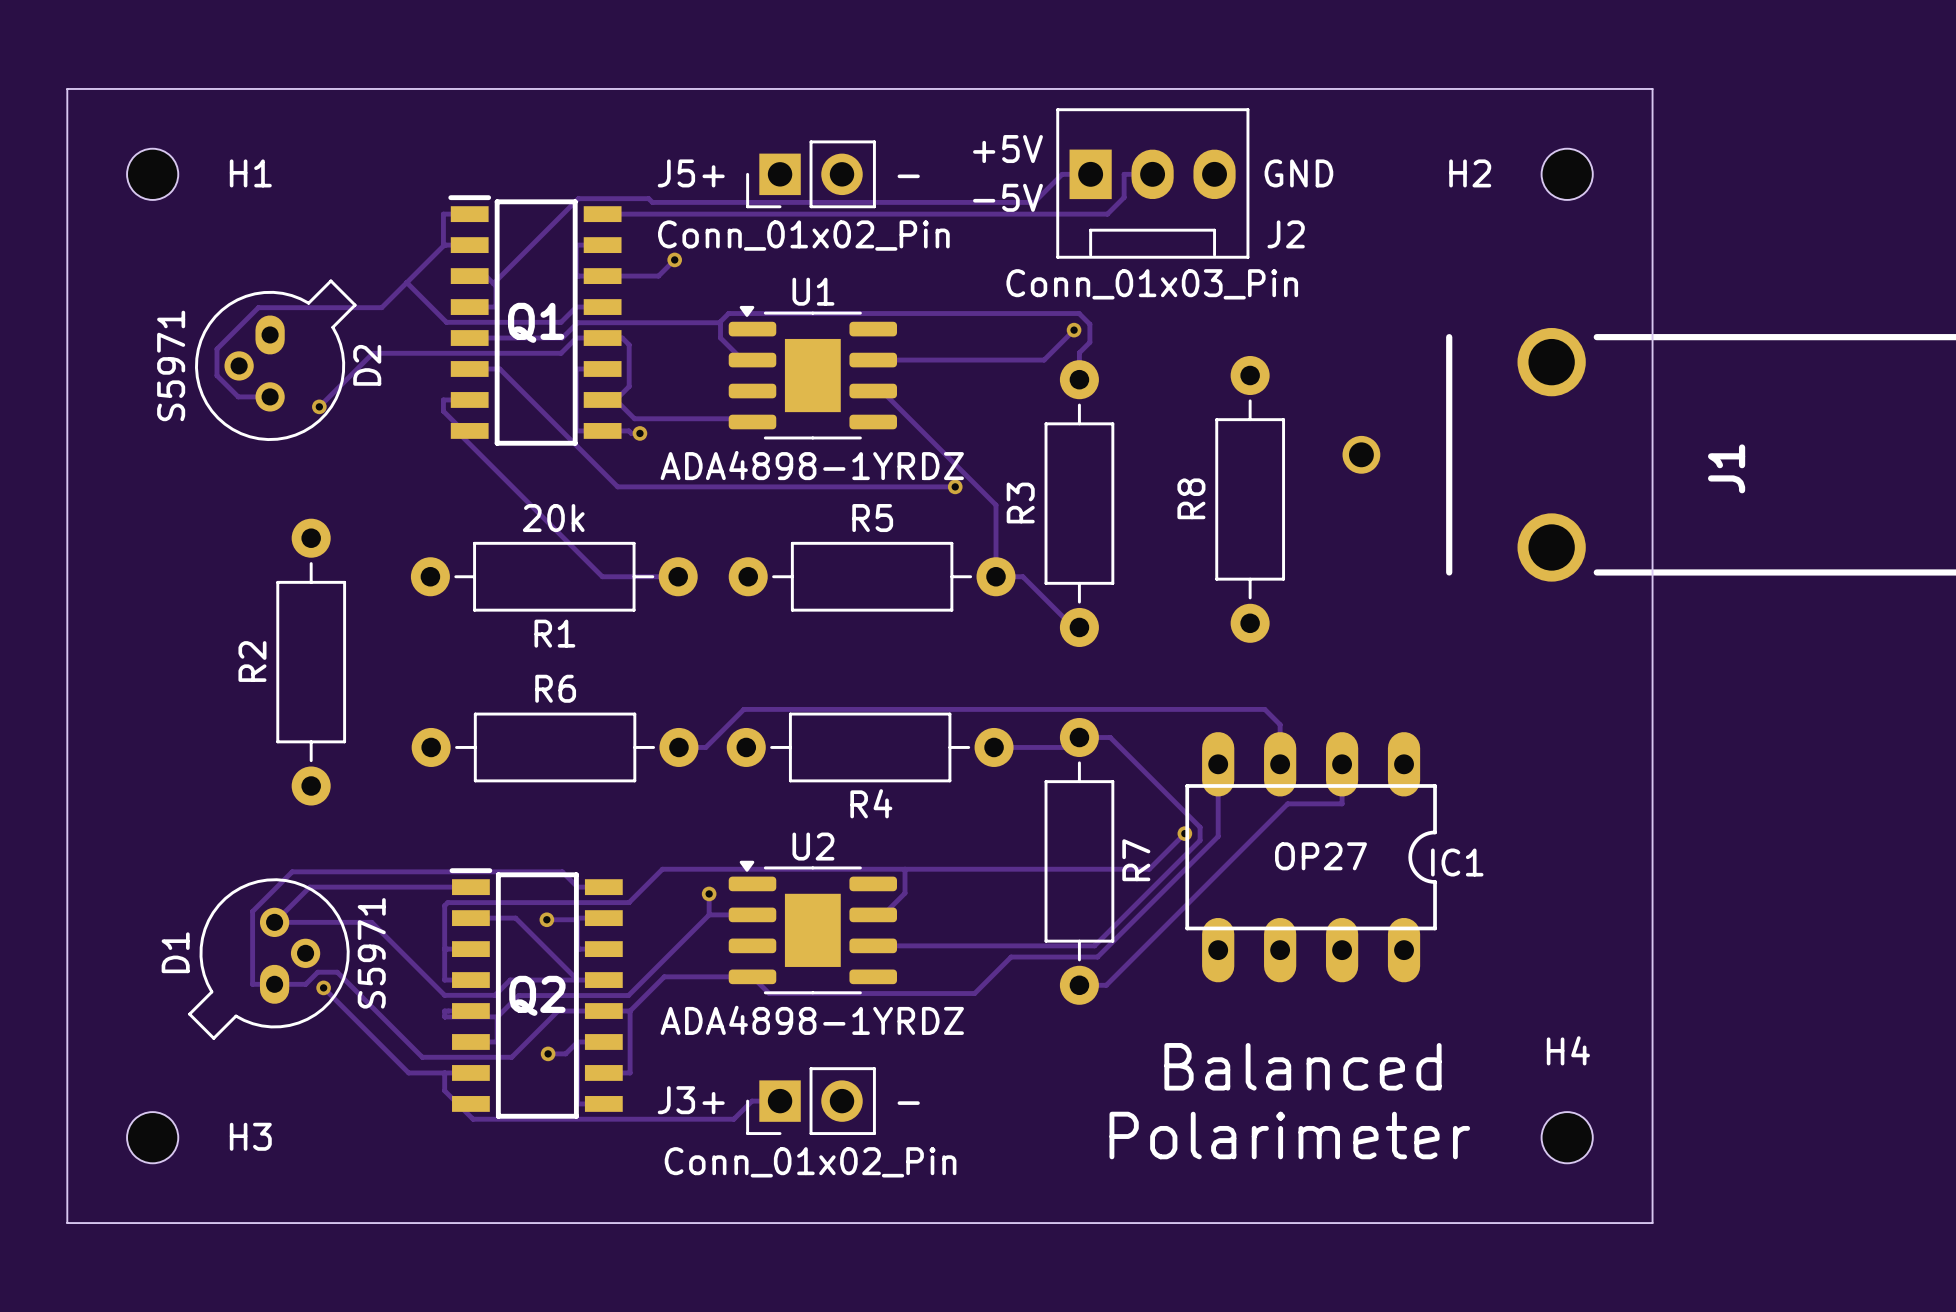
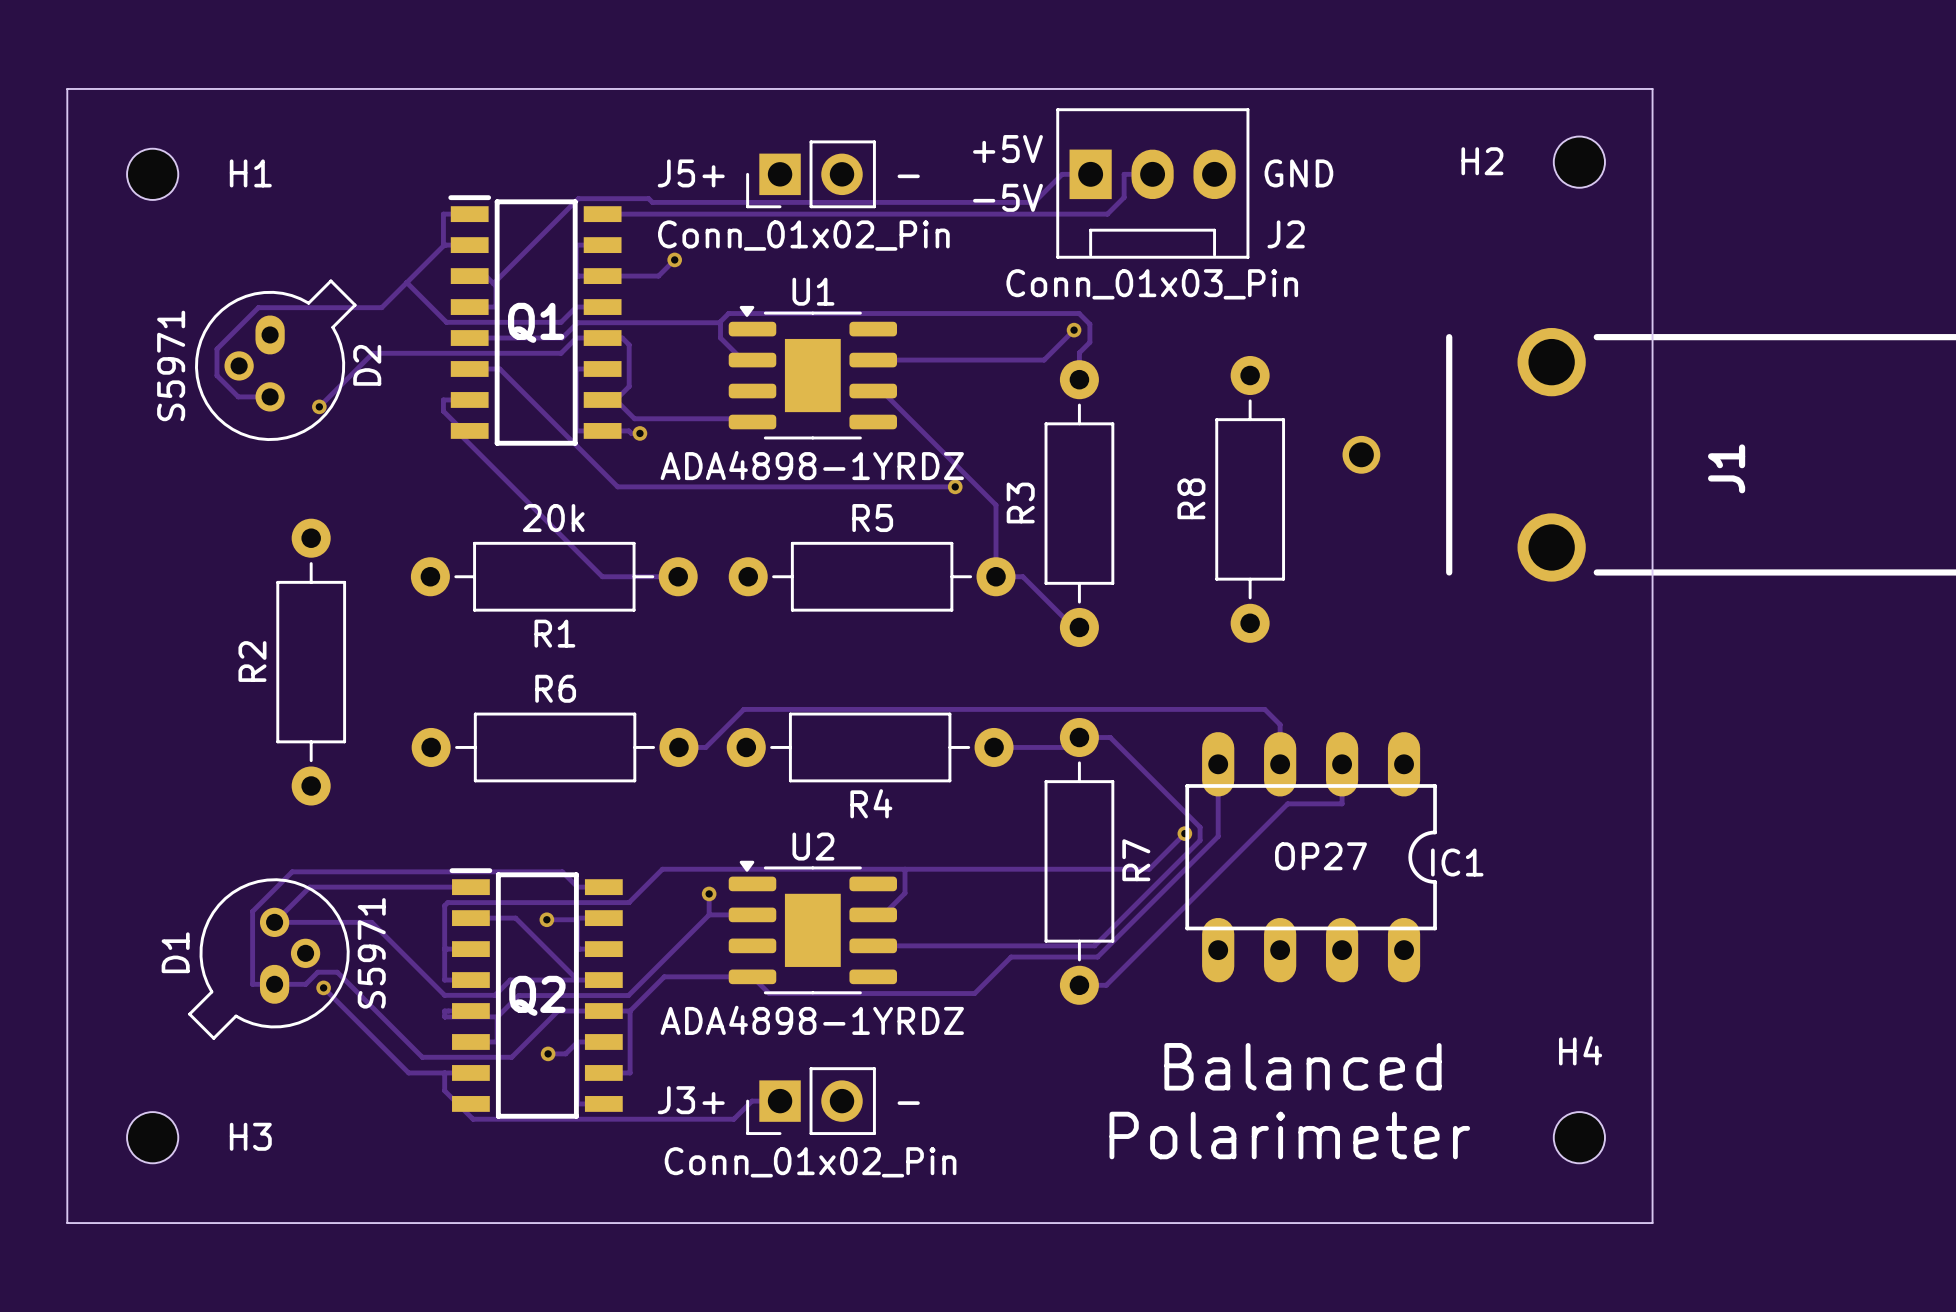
H2 position: (1567, 174) -> (1579, 162)
H4 position: (1567, 1137) -> (1579, 1137)

